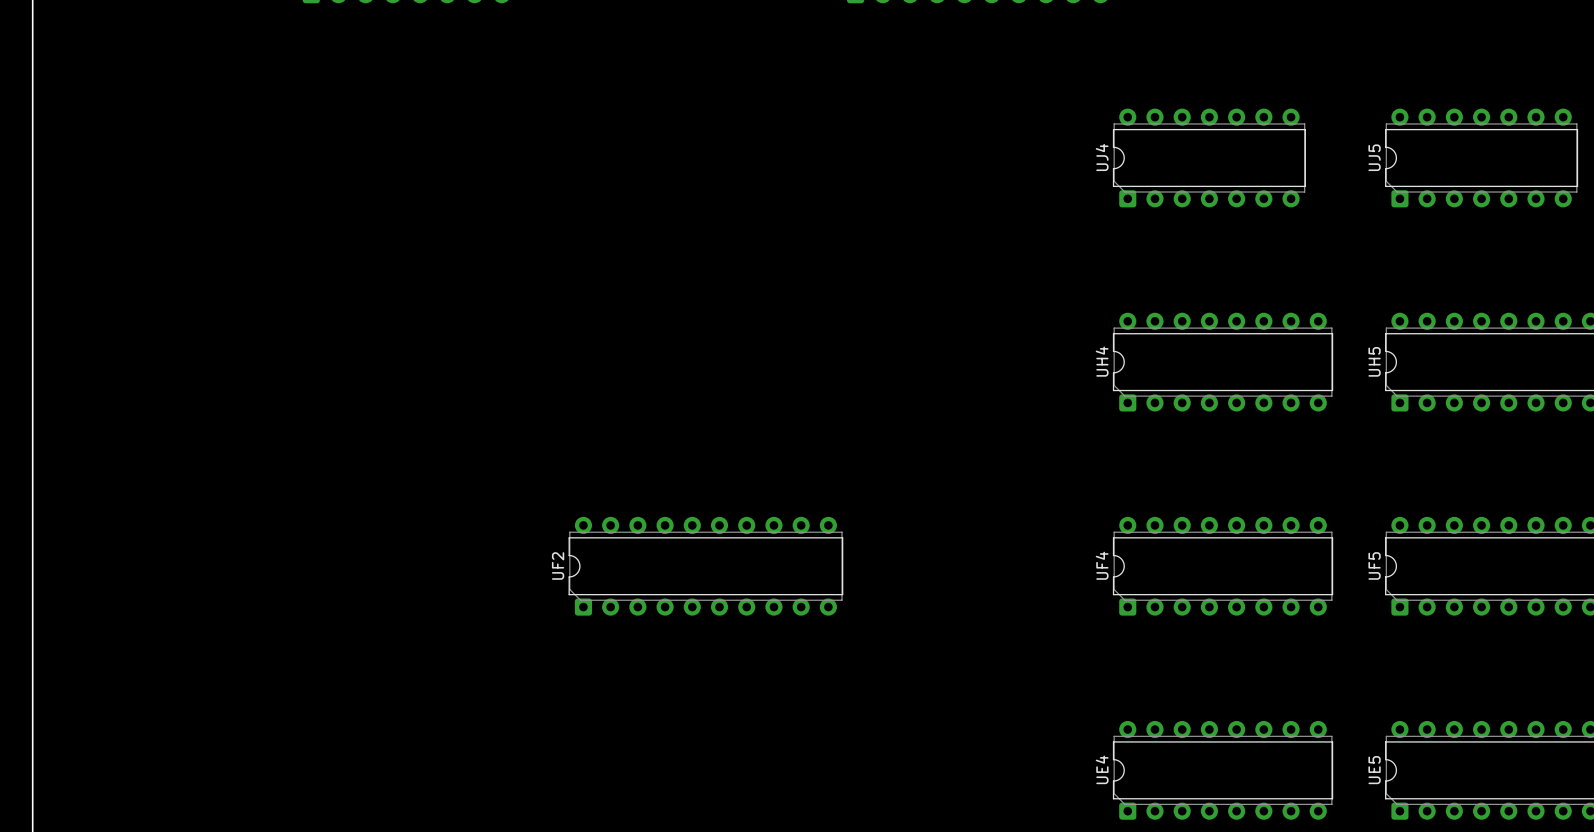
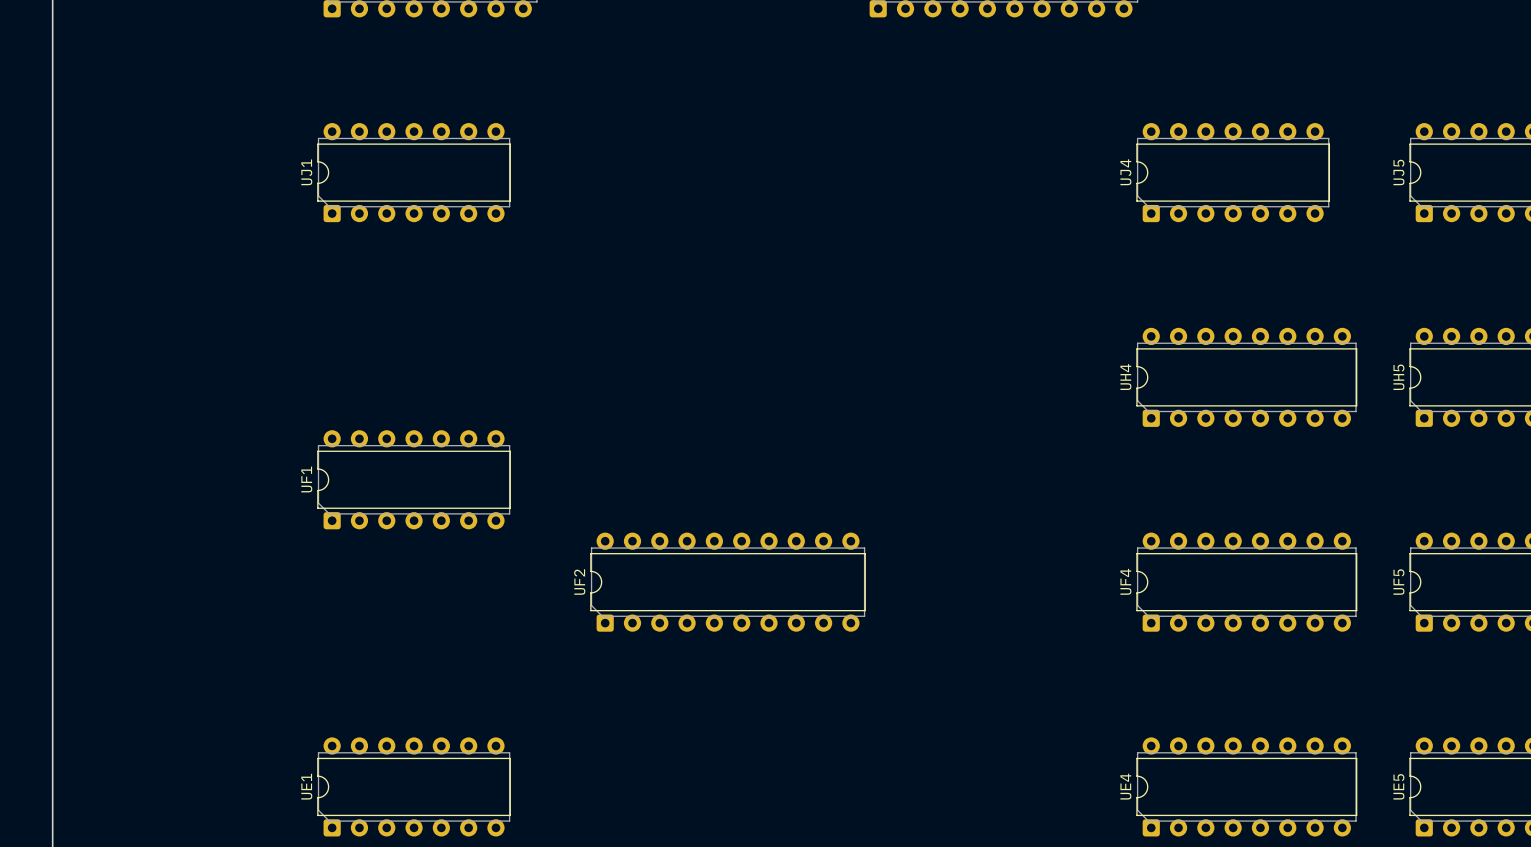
UJ1: none -> (414, 172)
UF1: none -> (414, 479)
UE1: none -> (414, 786)

